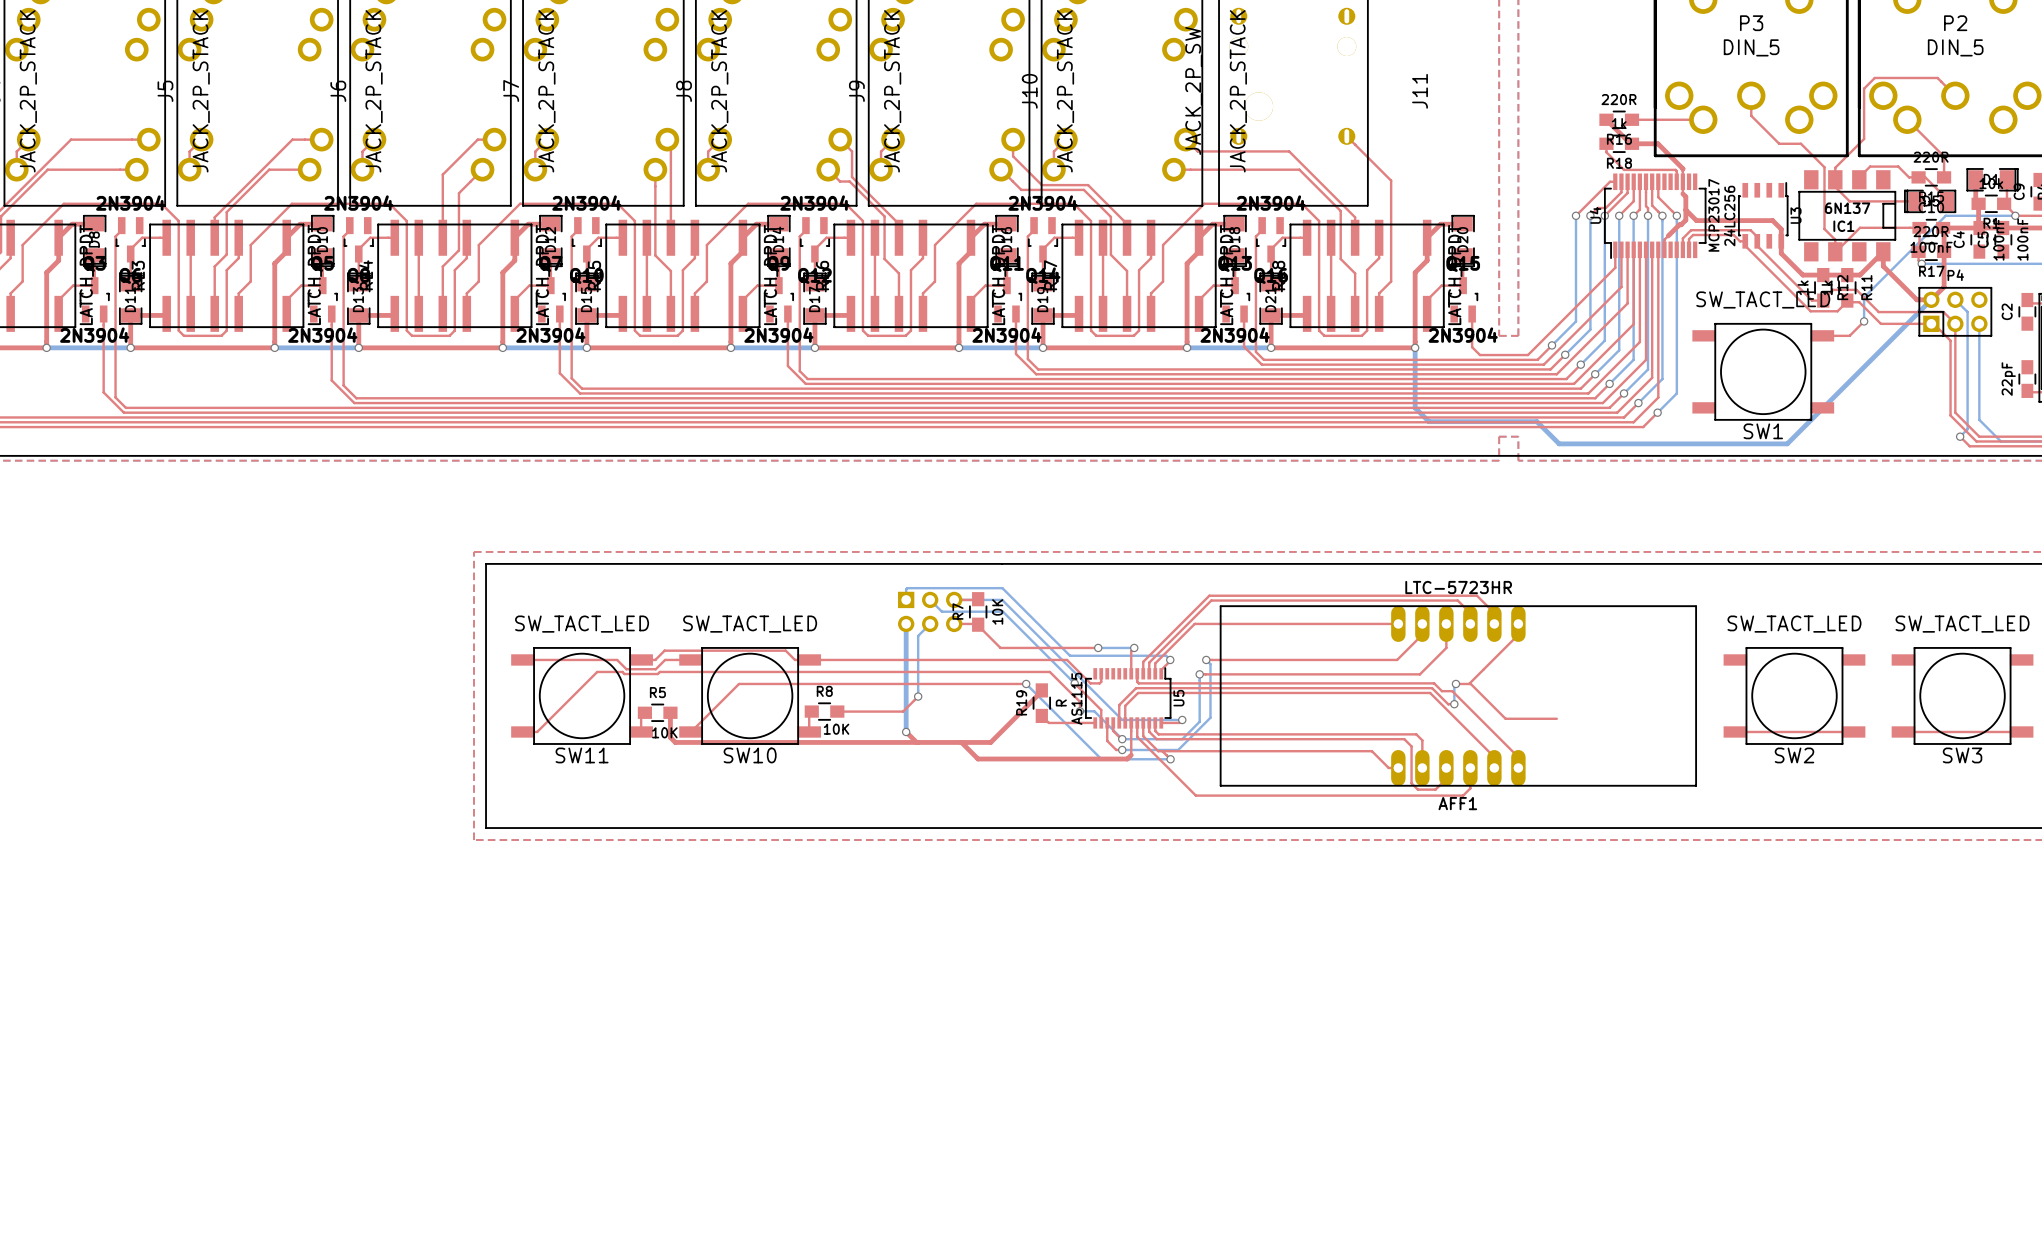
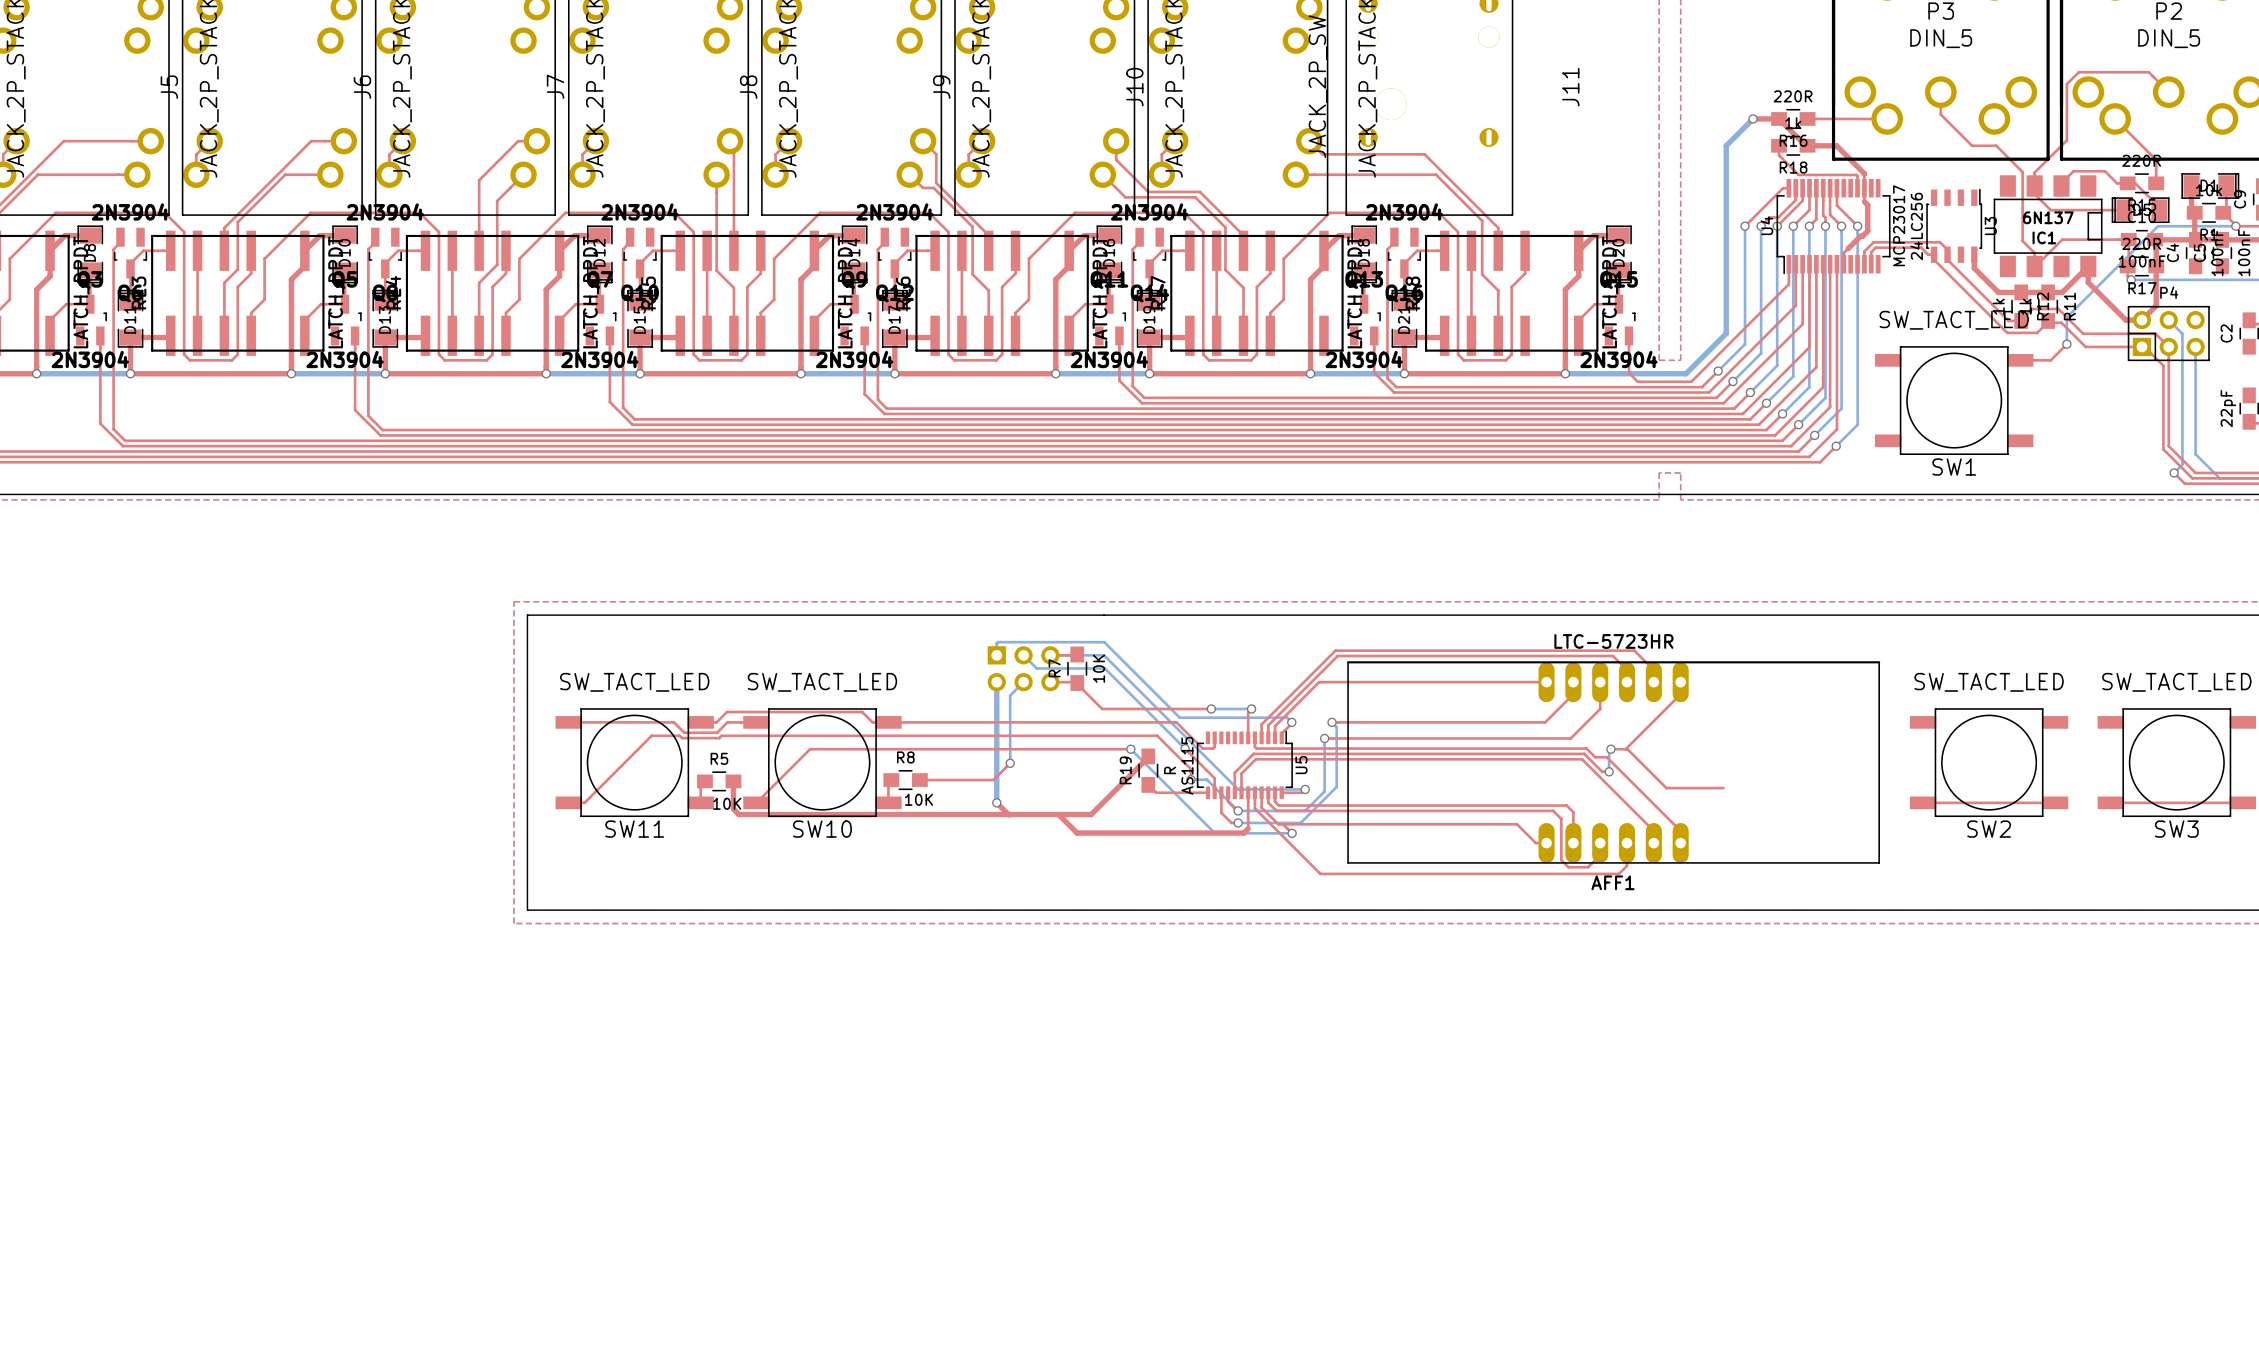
top track: none -> (1753, 118) (1779, 118)
via: none -> (1753, 118)
top track: (1346, 136) (1391, 180) (1391, 281) (1379, 293) (1379, 313) -> none
top track: (1685, 209) (1696, 220) (1772, 220) (1781, 229) (1781, 241) -> none
top track: (1235, 285) (1213, 285) (1199, 300) (1199, 313) -> none
bottom track: (1931, 299) (1787, 443) (1559, 443) (1536, 421) (1428, 421) (1415, 407) (1415, 347) -> (1753, 118) (1726, 145) (1726, 333) (1686, 373) (1565, 373)

